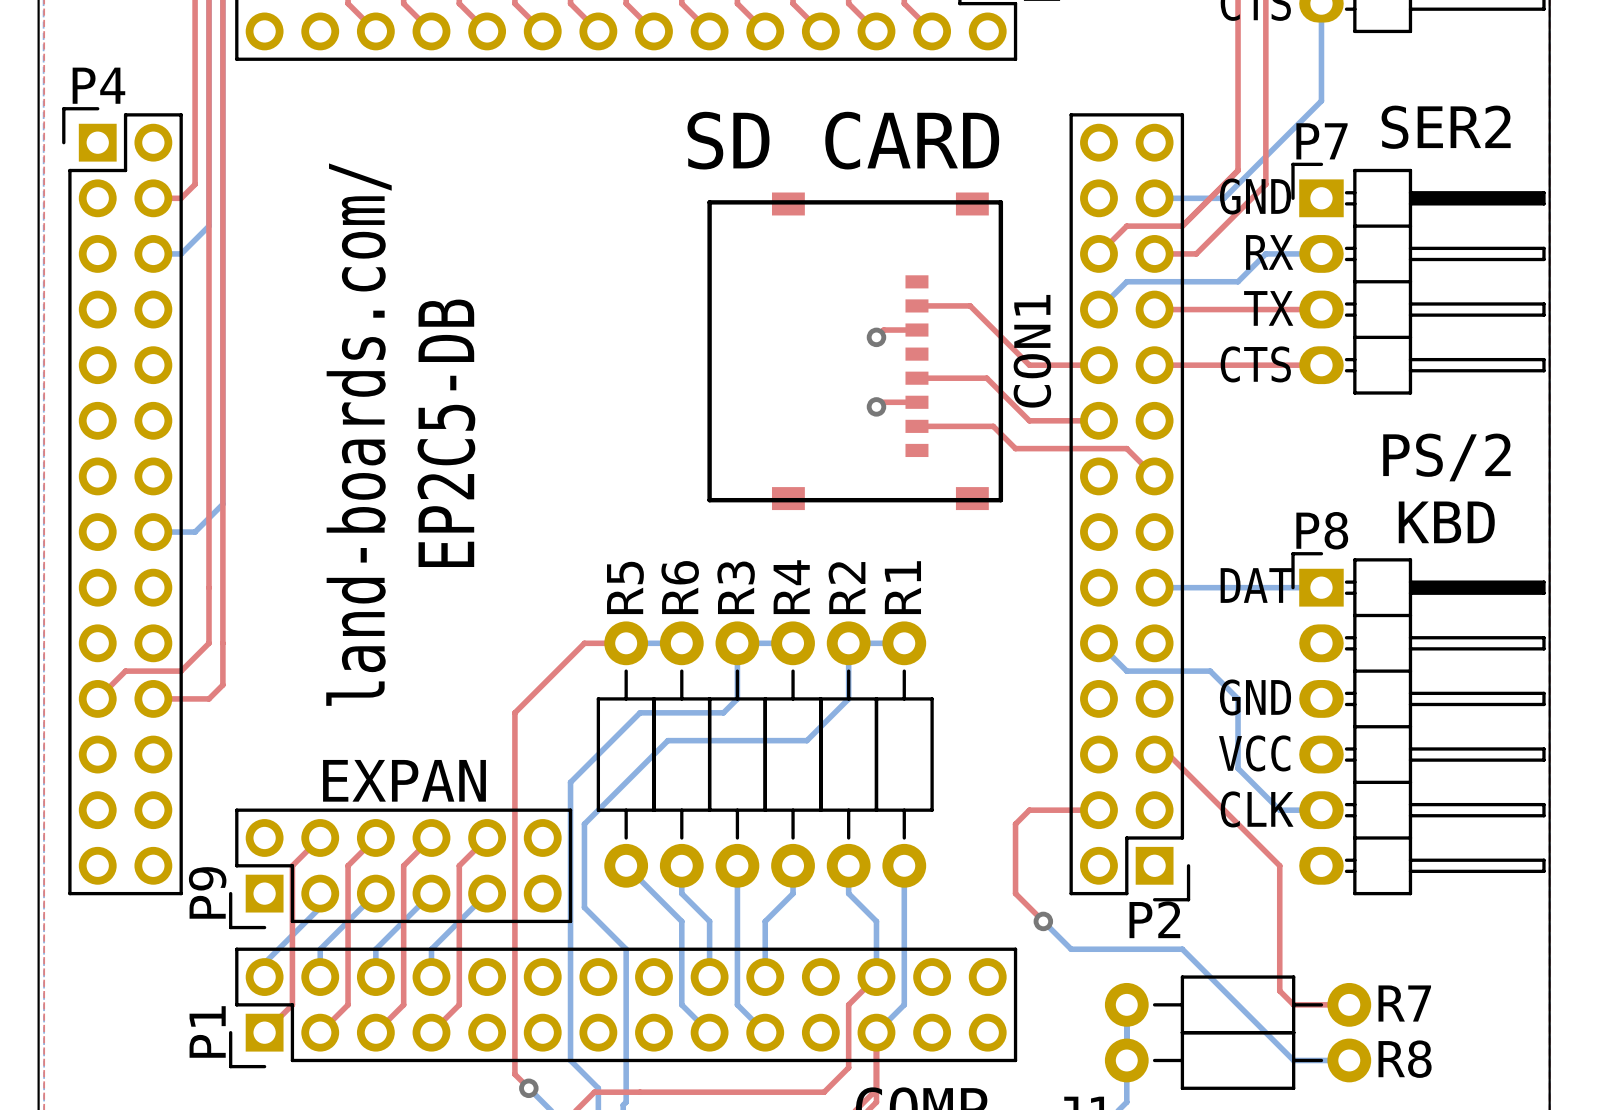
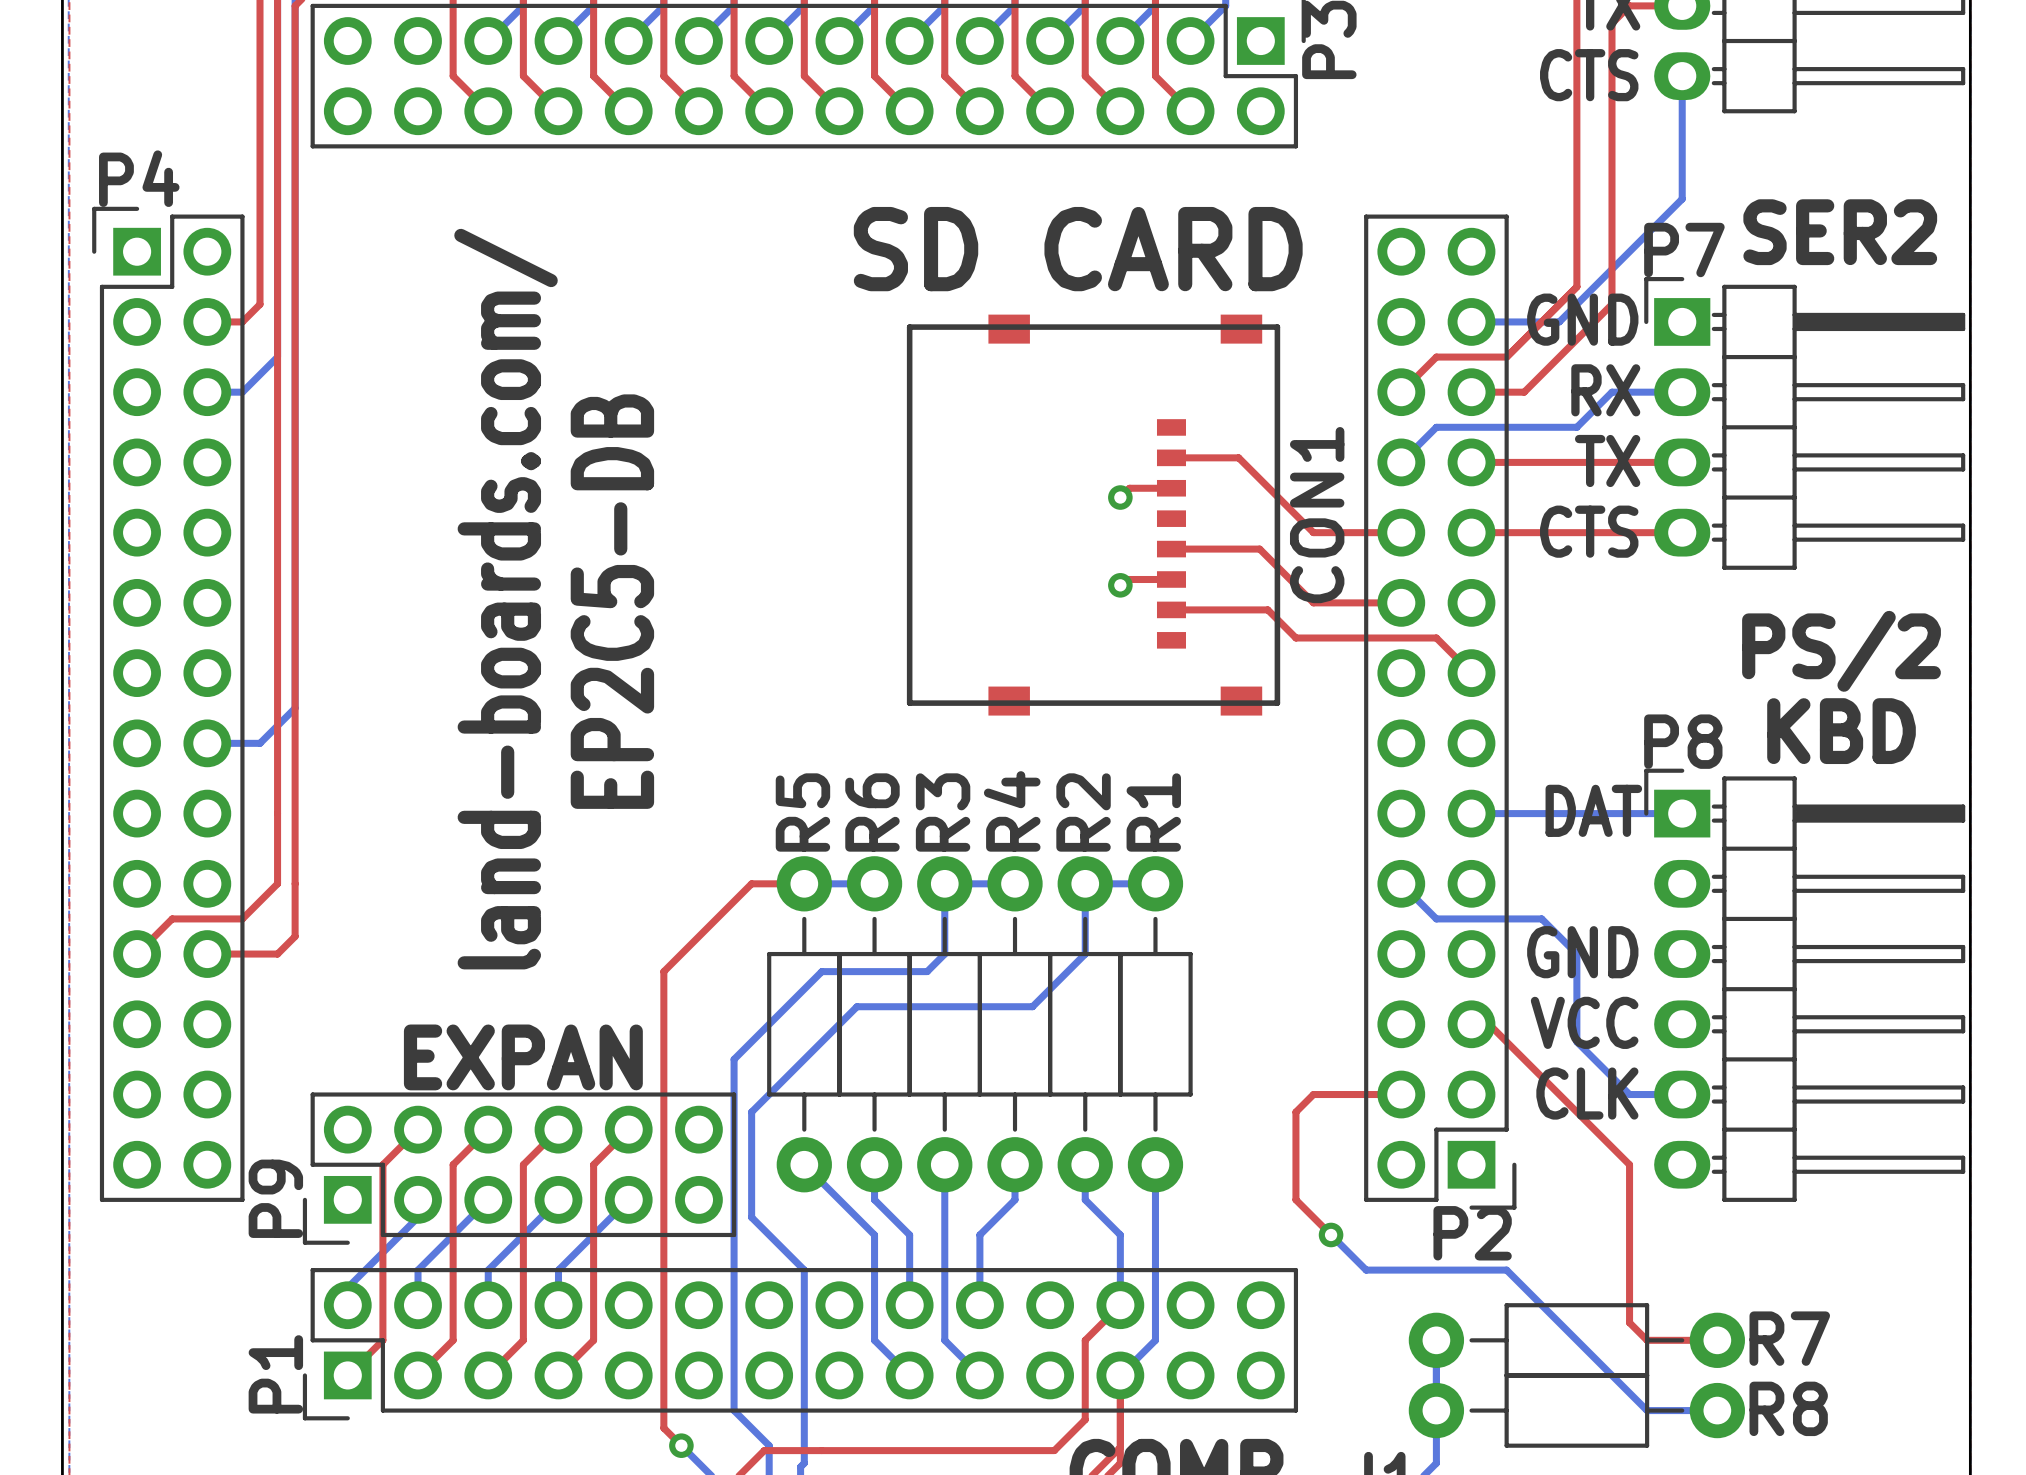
text position: EP2C5-DB (446, 433) -> EP2C5-DB (612, 601)
text position: land-boards.com/ (358, 434) -> land-boards.com/ (506, 599)

